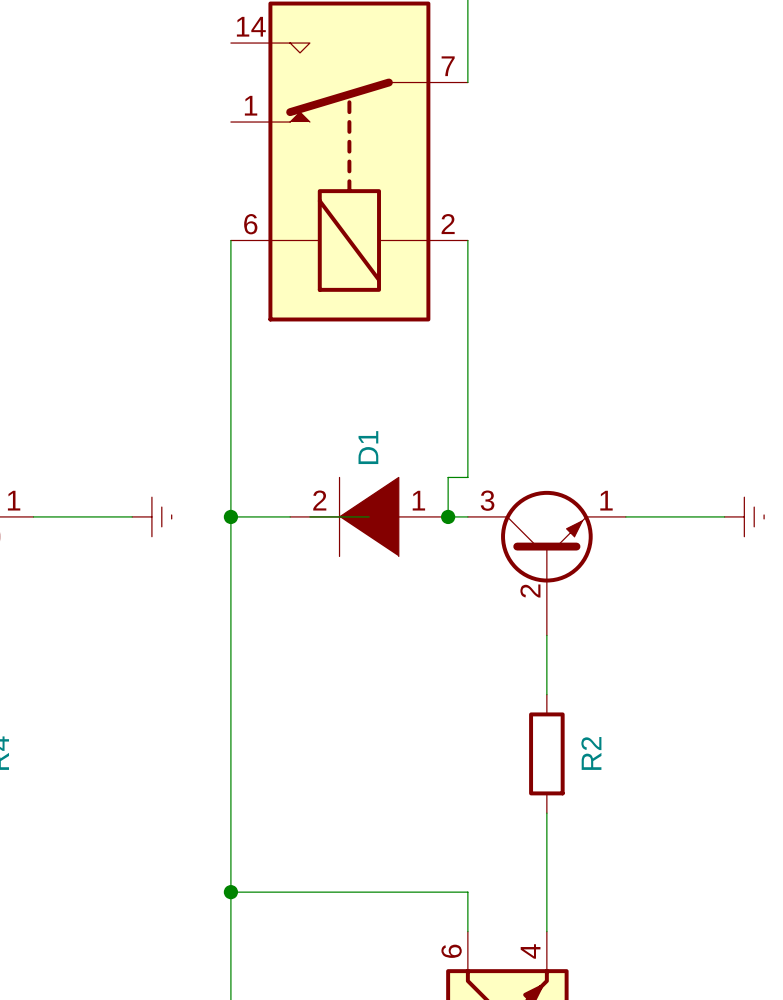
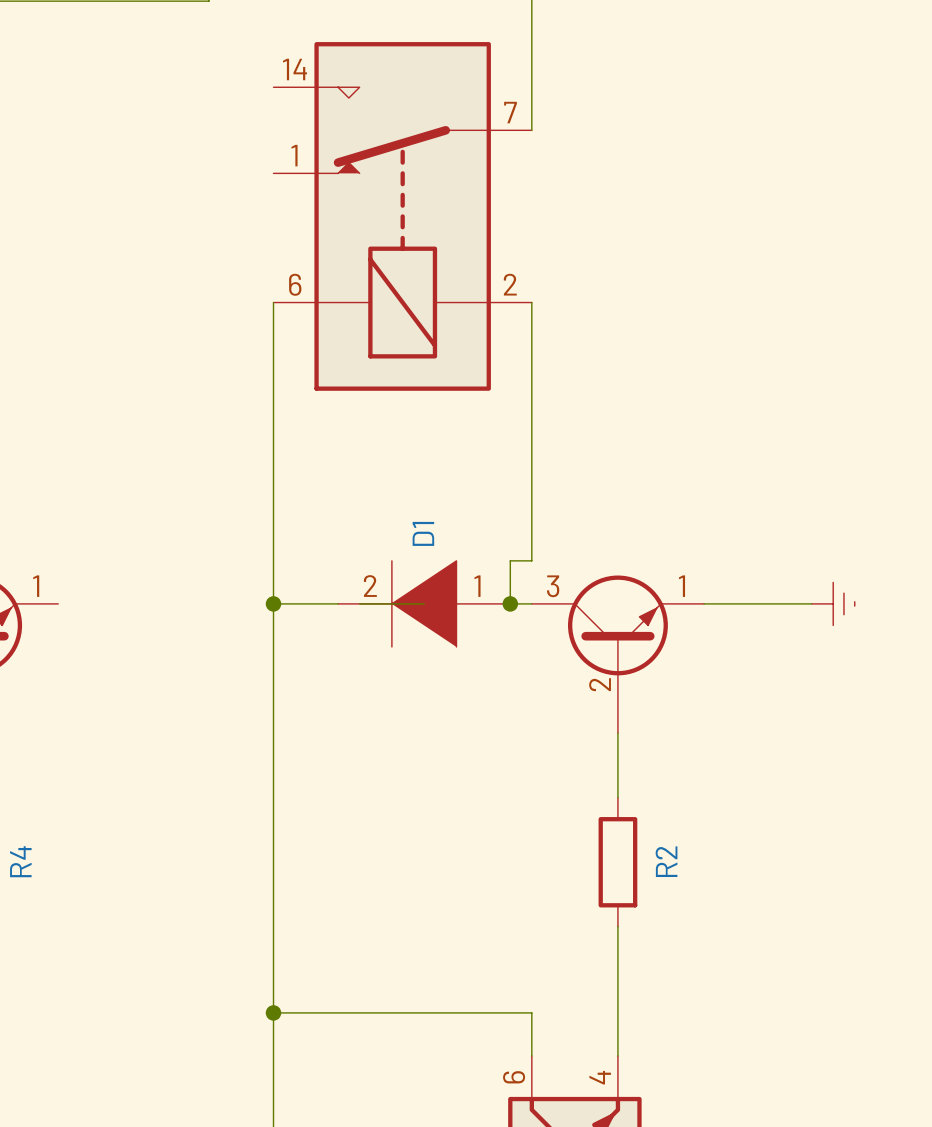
wire: (33, 516) (132, 516) -> none
power symbol: (151, 516) -> none

